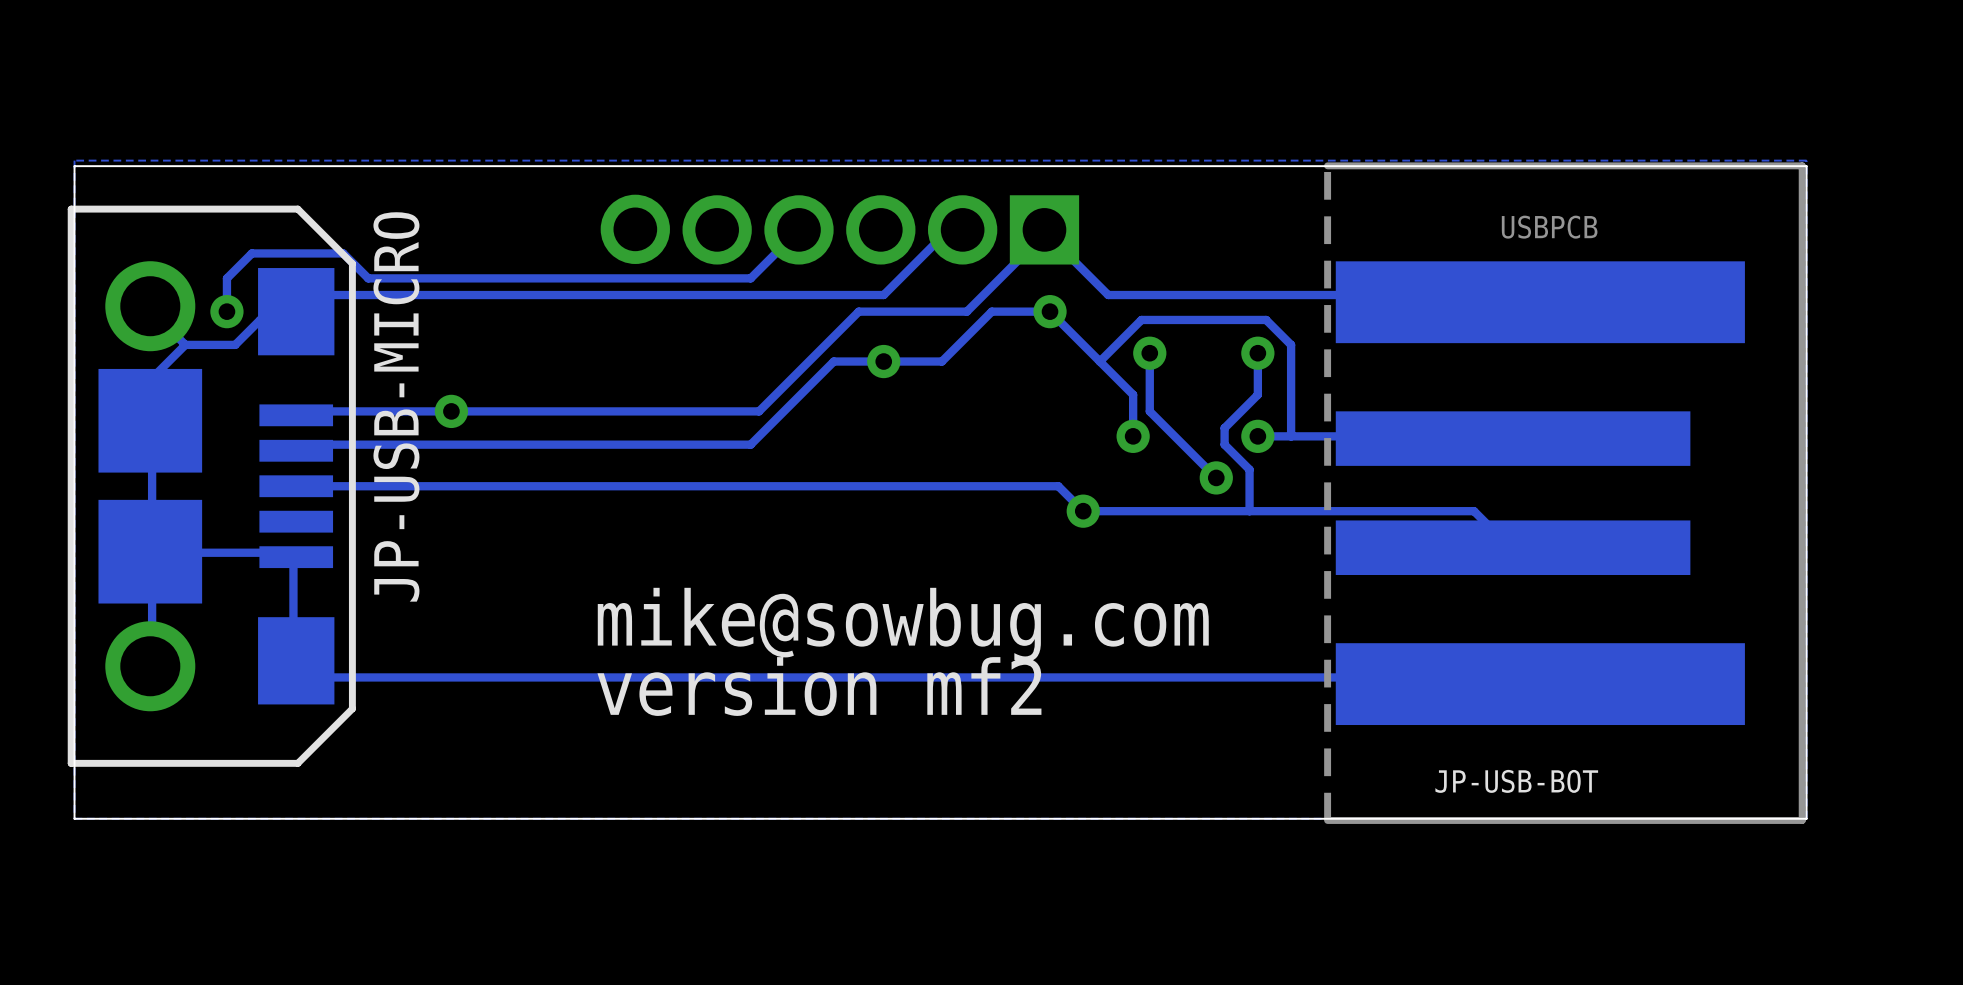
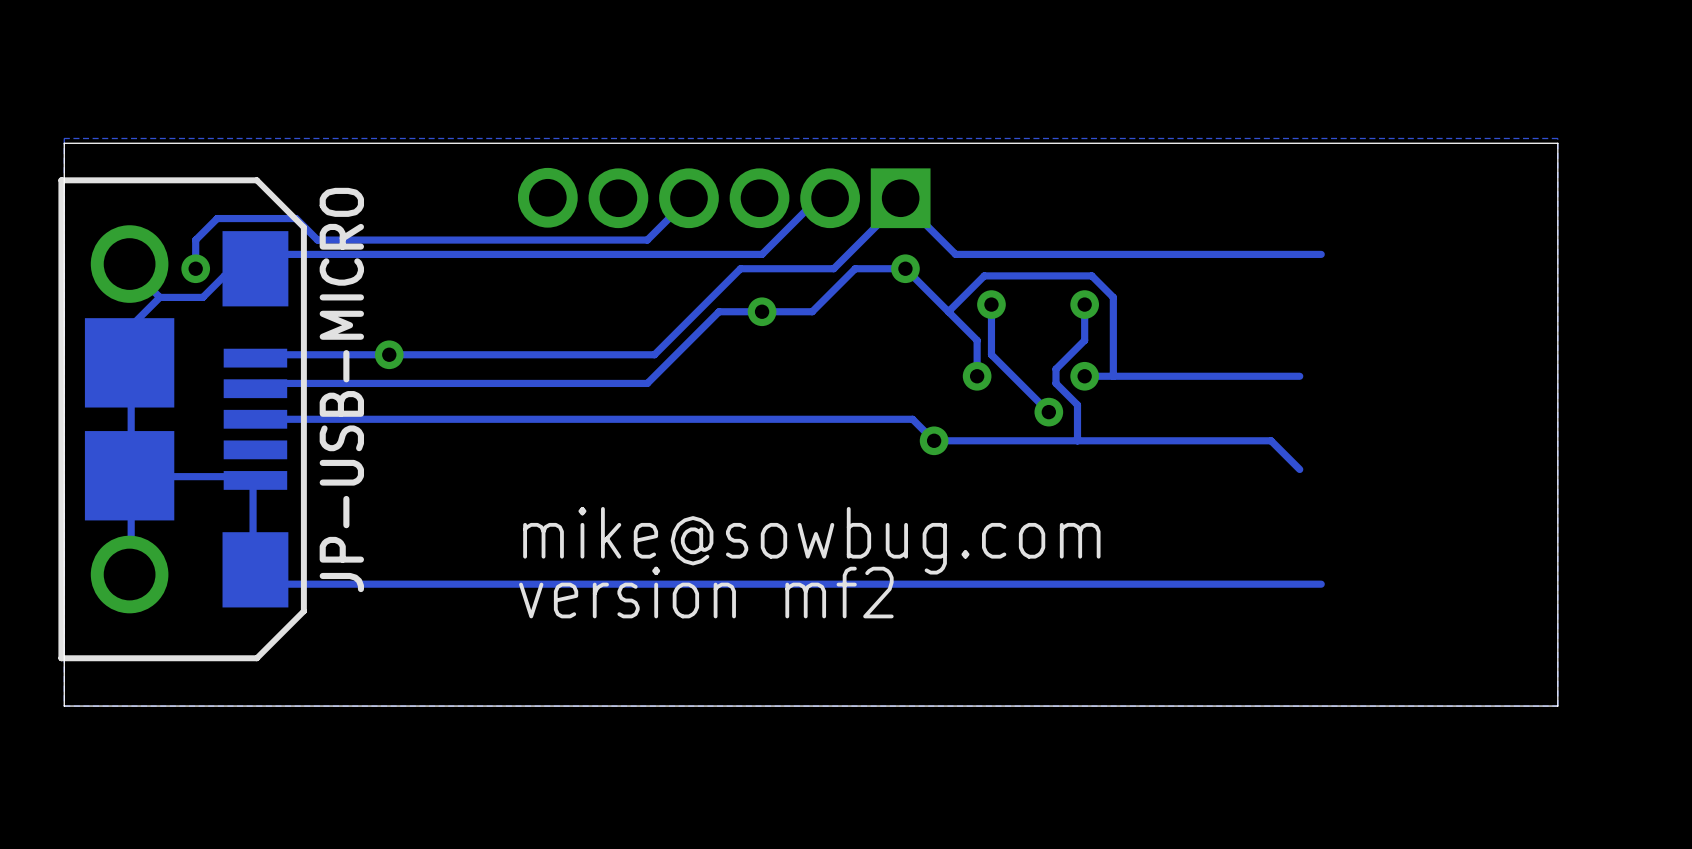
JP-USB-BOT: USBPCB (1564, 493) -> none

